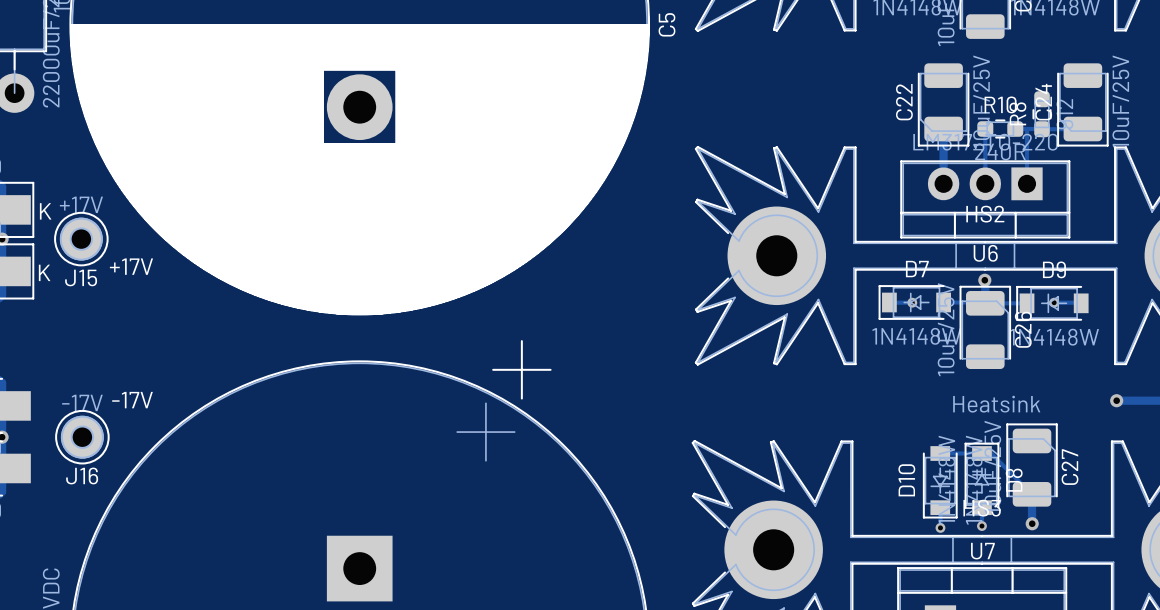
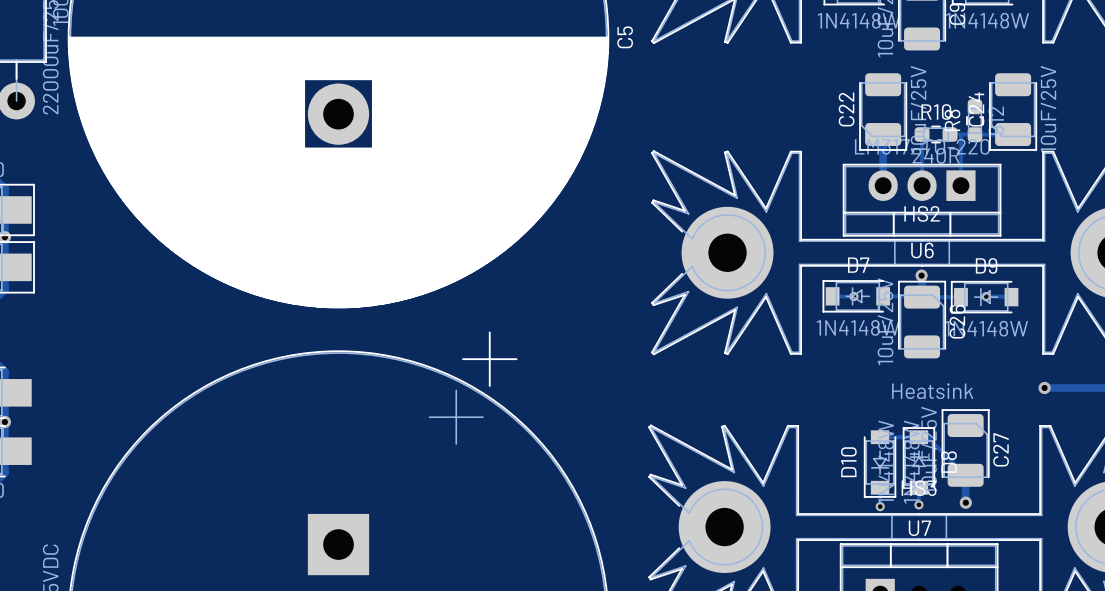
text: K (45, 211) -> none
J15: +17V (81, 239) -> none
text: +17V (131, 266) -> none
text: K (44, 272) -> none
text: -17V (132, 400) -> none
J16: -17V (82, 437) -> none

